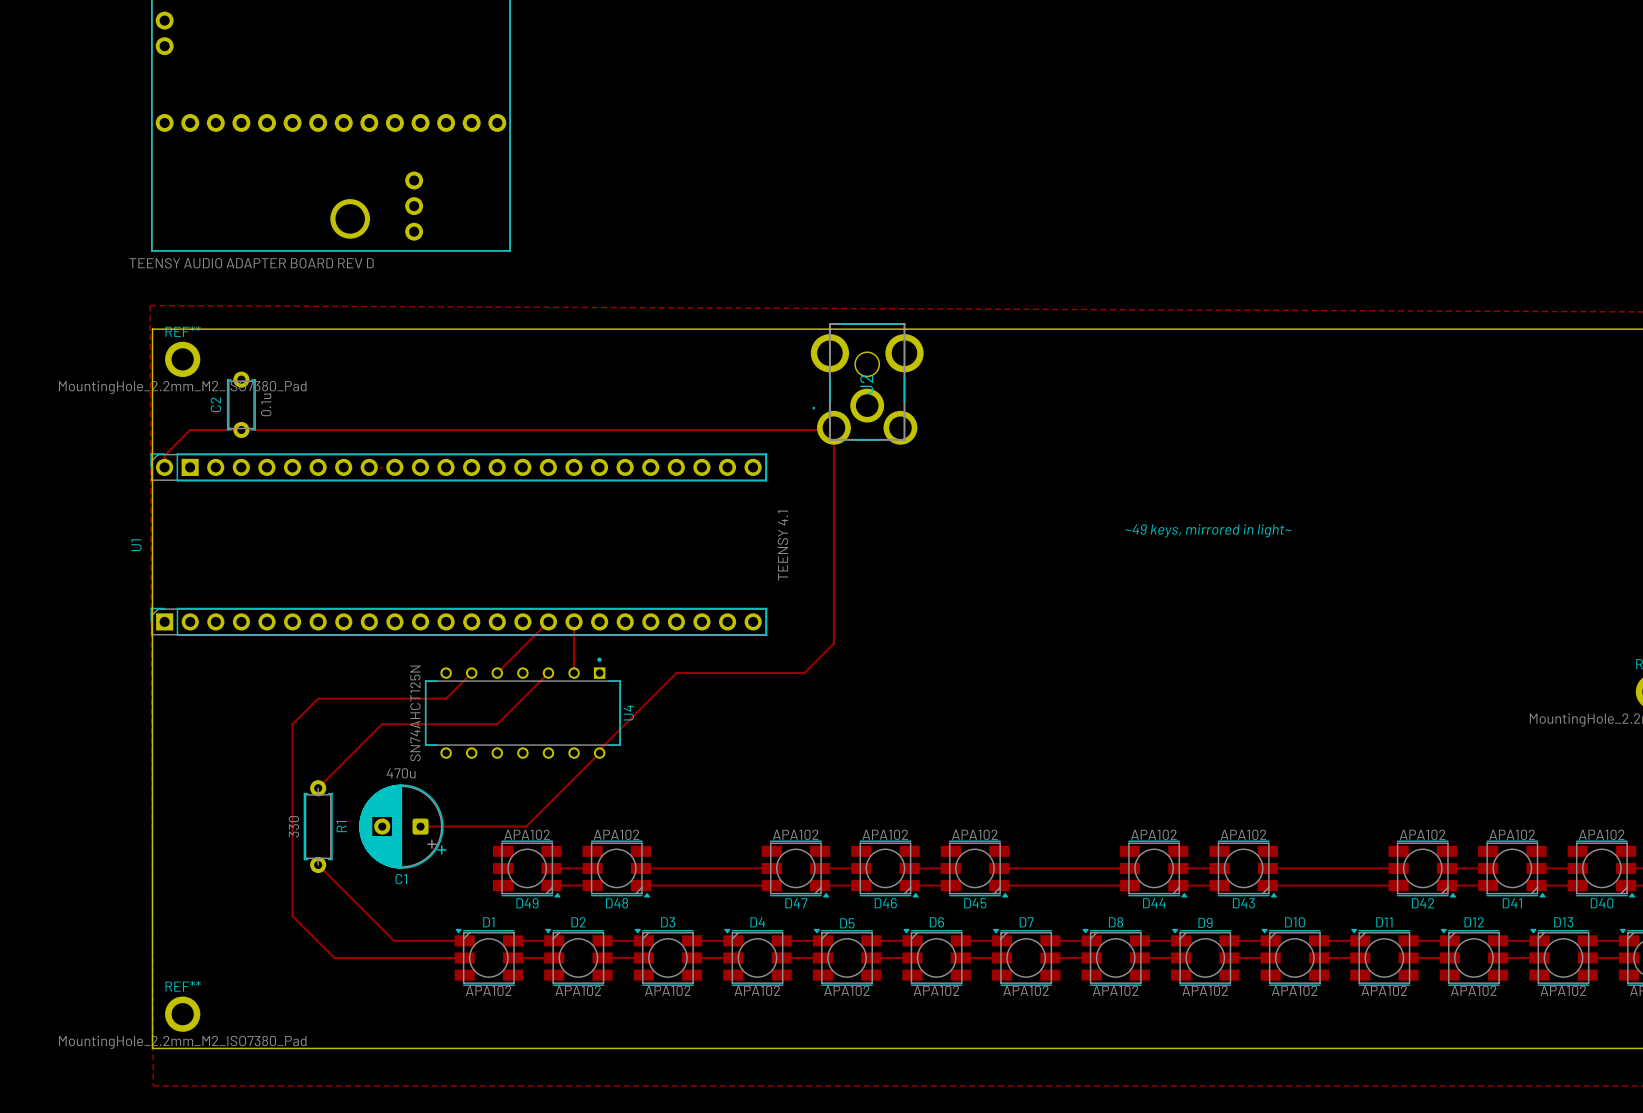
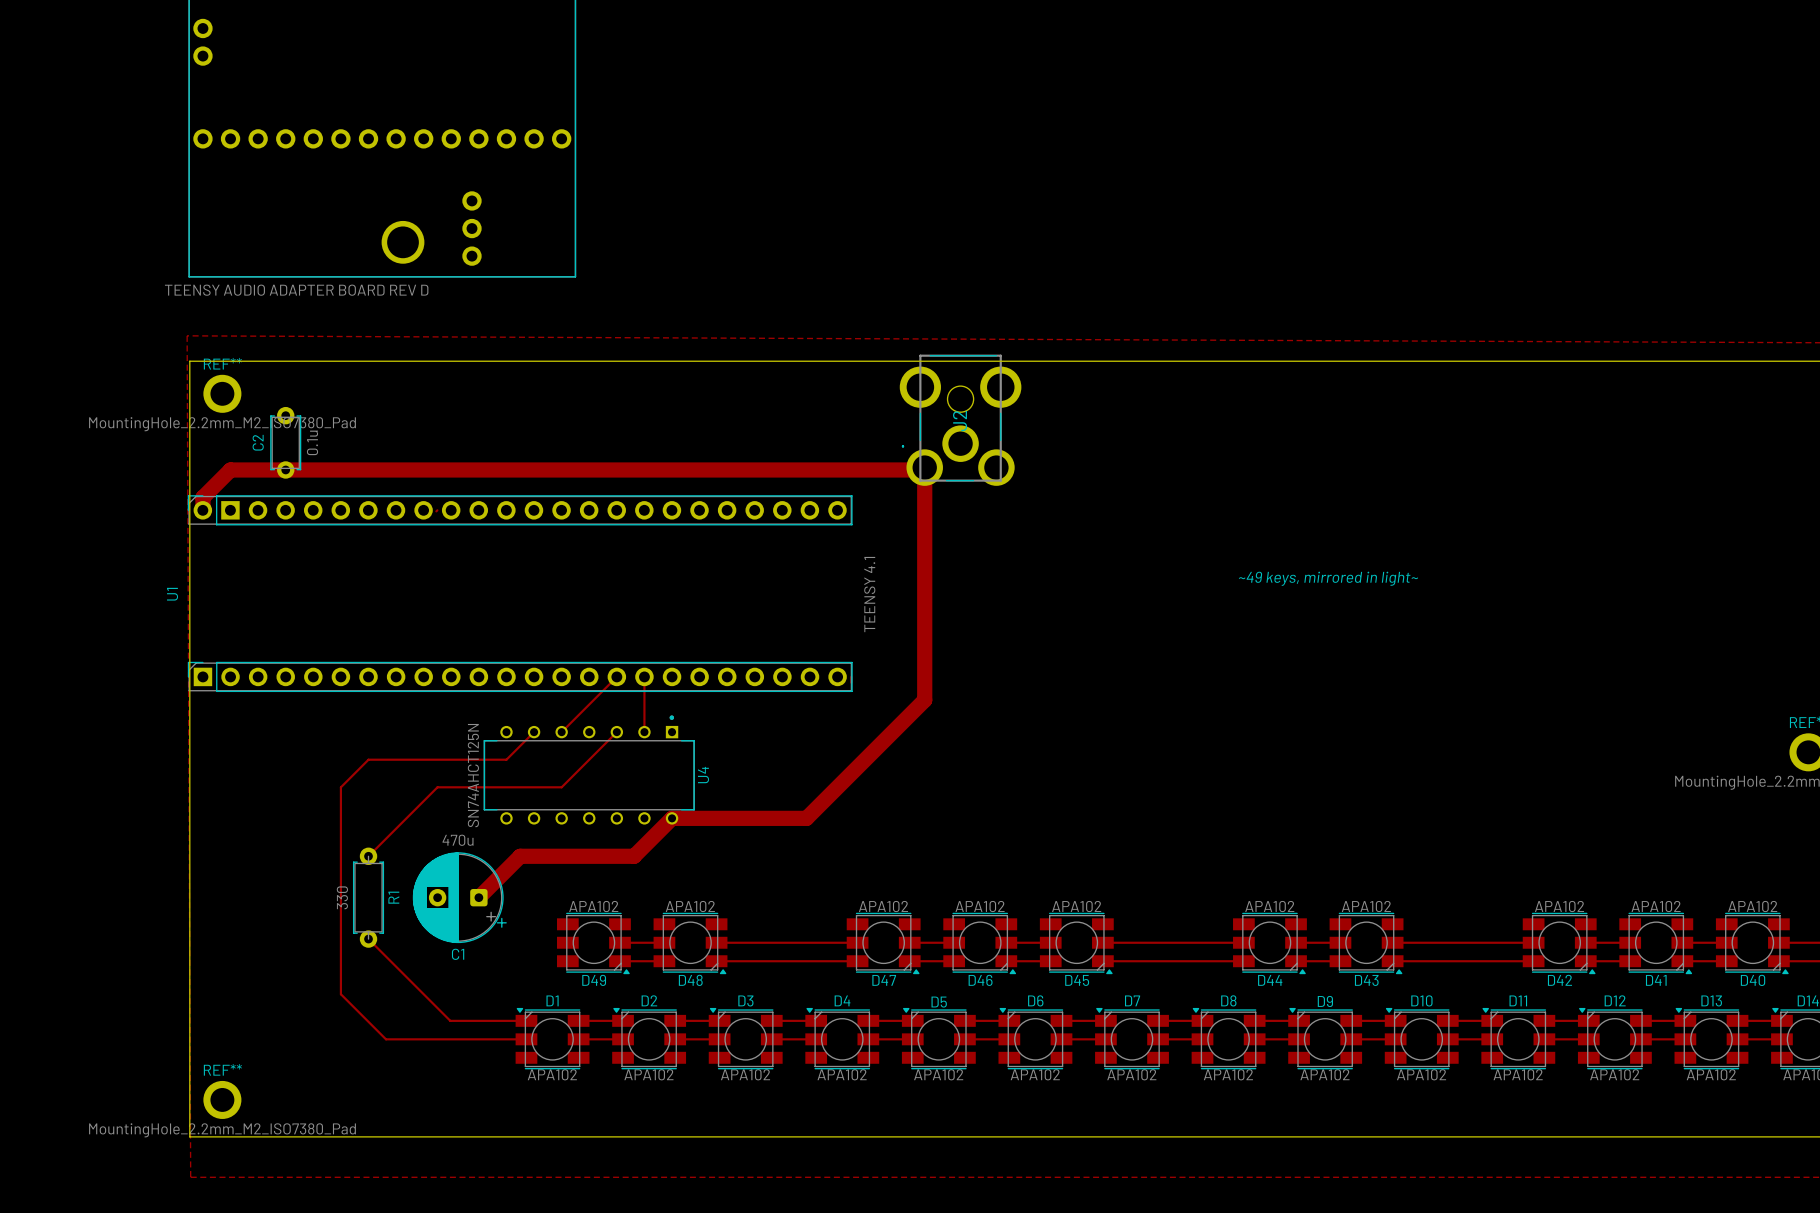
track width: thin (164, 468) (164, 455) (190, 429) (831, 429) (833, 427) (833, 643) (804, 673) -> thick (202, 511) (202, 497) (230, 469) (922, 469) (924, 467) (924, 700) (892, 732)
track: (804, 673) (676, 673) (599, 749) (599, 753) -> (892, 732) (806, 818) (672, 818)
track width: thin (599, 753) (564, 788) -> thick (672, 818) (634, 856)
track: (564, 788) (526, 826) (420, 826) -> (634, 856) (520, 856) (478, 897)

